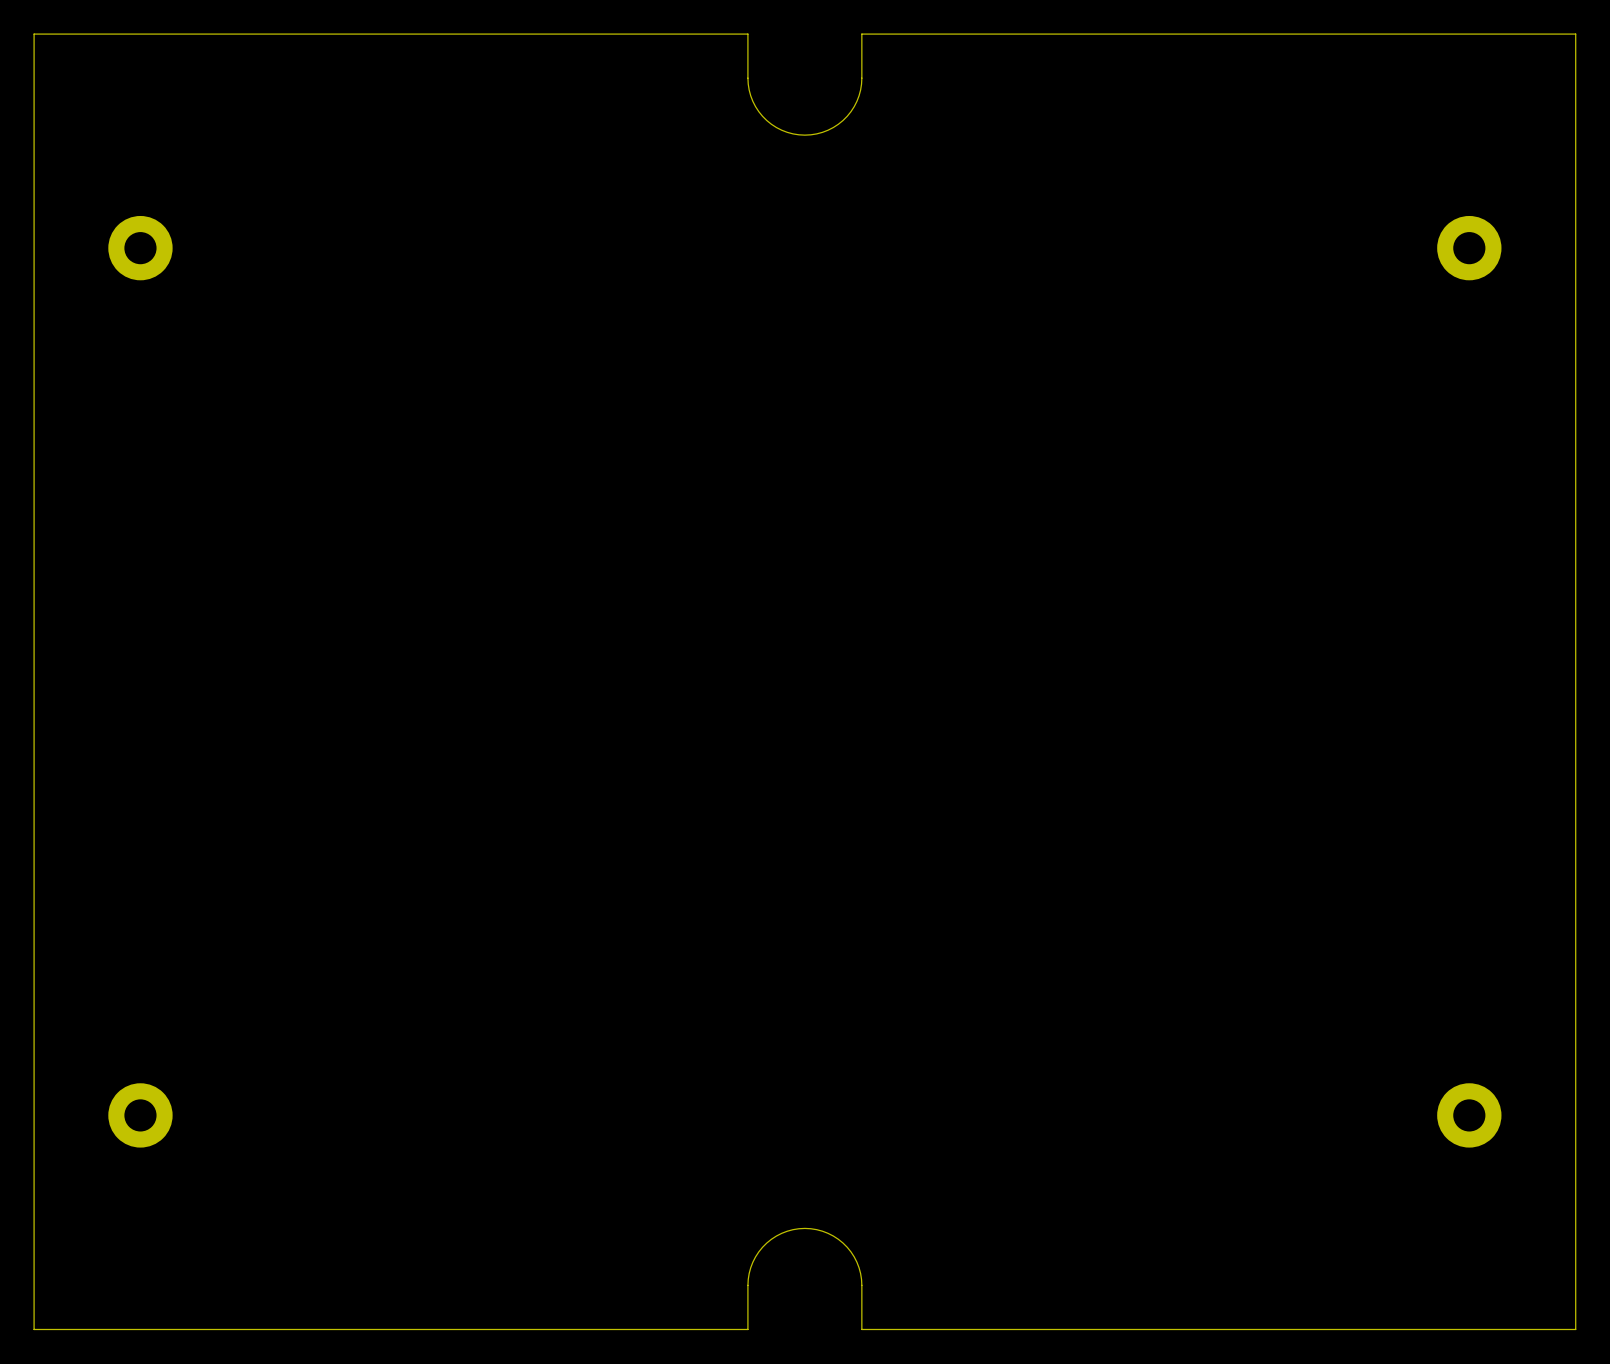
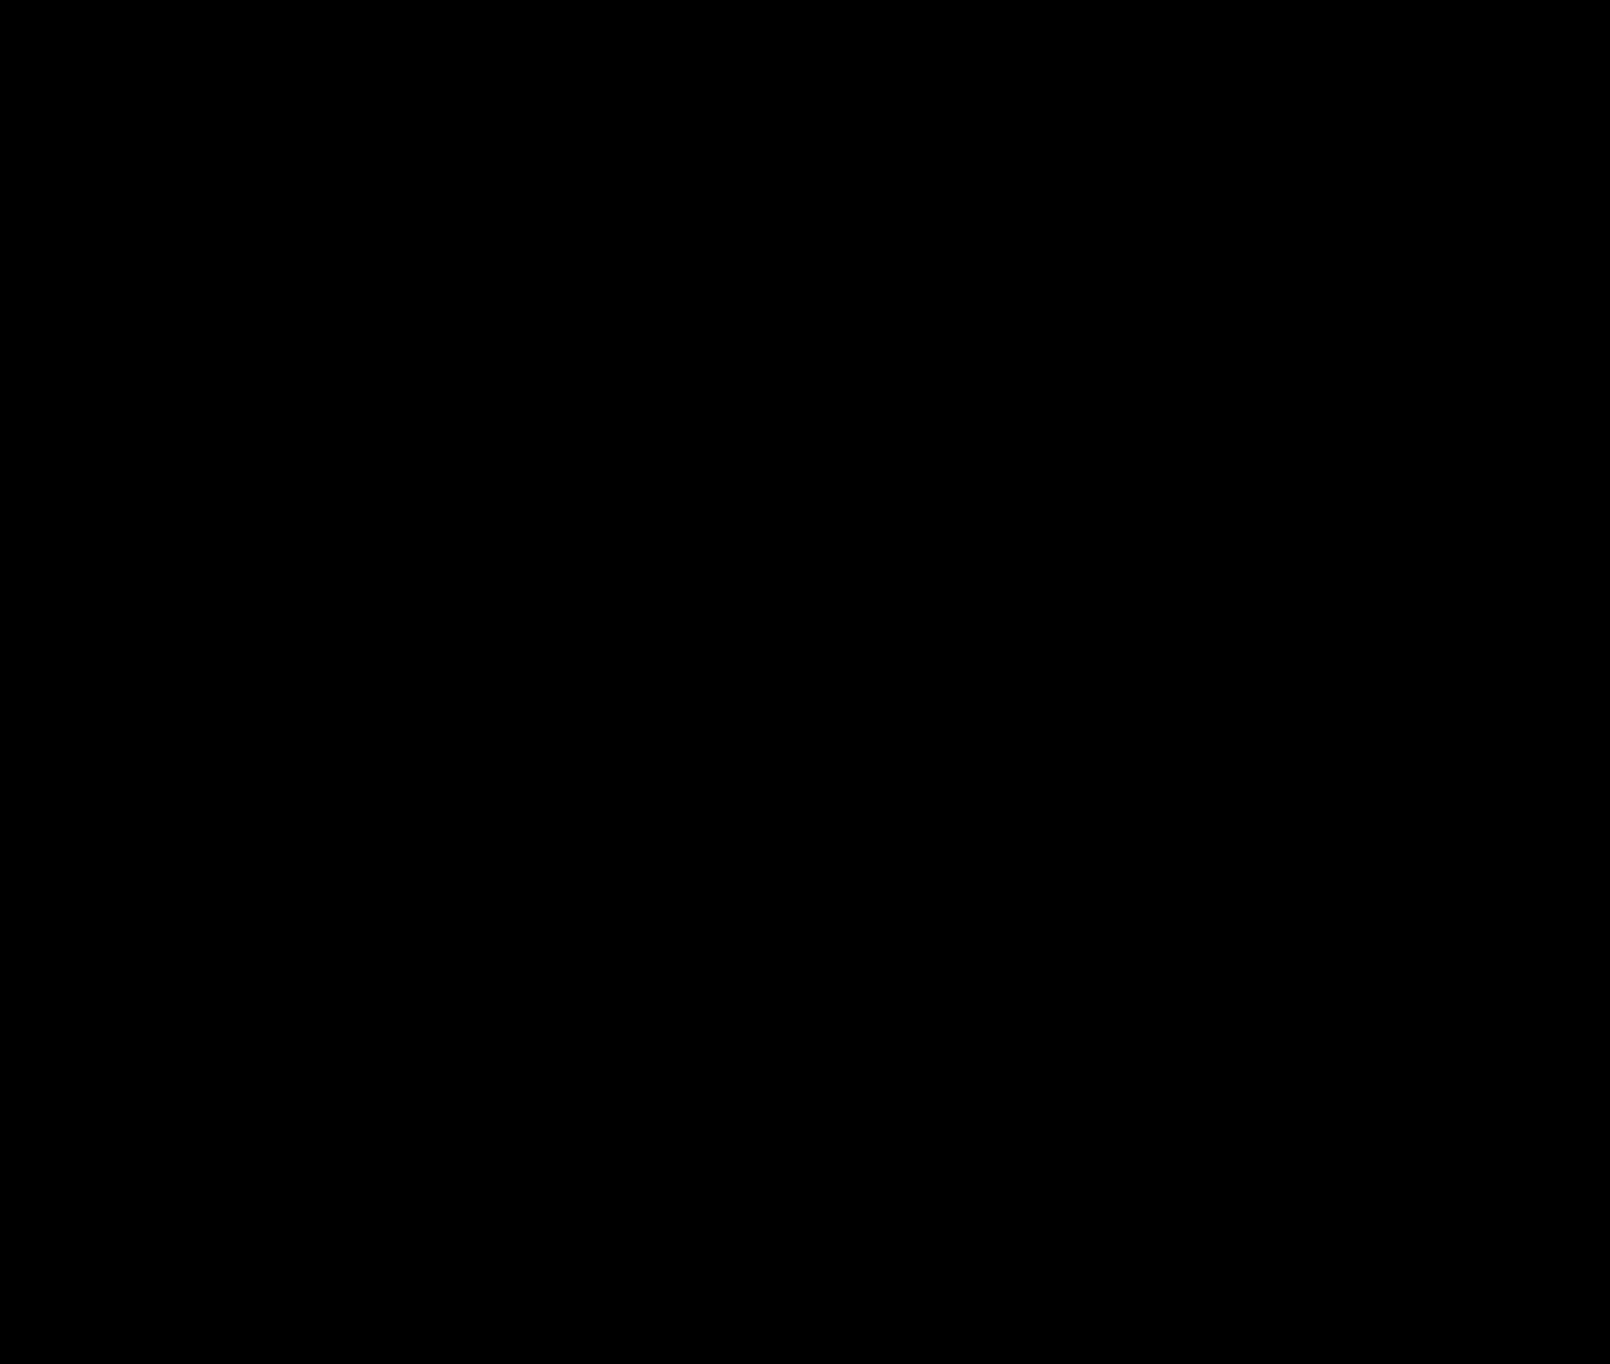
board edge: (34, 34) (747, 34) (748, 84) (755, 106) (766, 120) (776, 127) (793, 133) (804, 135) (822, 132) (833, 127) (843, 120) (854, 106) (861, 84) (861, 34) (1575, 34) (1575, 1329) (861, 1329) (861, 1279) (854, 1256) (843, 1243) (833, 1236) (816, 1229) (804, 1228) (793, 1229) (776, 1236) (766, 1243) (755, 1256) (748, 1279) (747, 1329) (34, 1329) (34, 34) -> none
part: (140, 248) -> none
part: (1469, 248) -> none
part: (140, 1115) -> none
part: (1469, 1115) -> none

